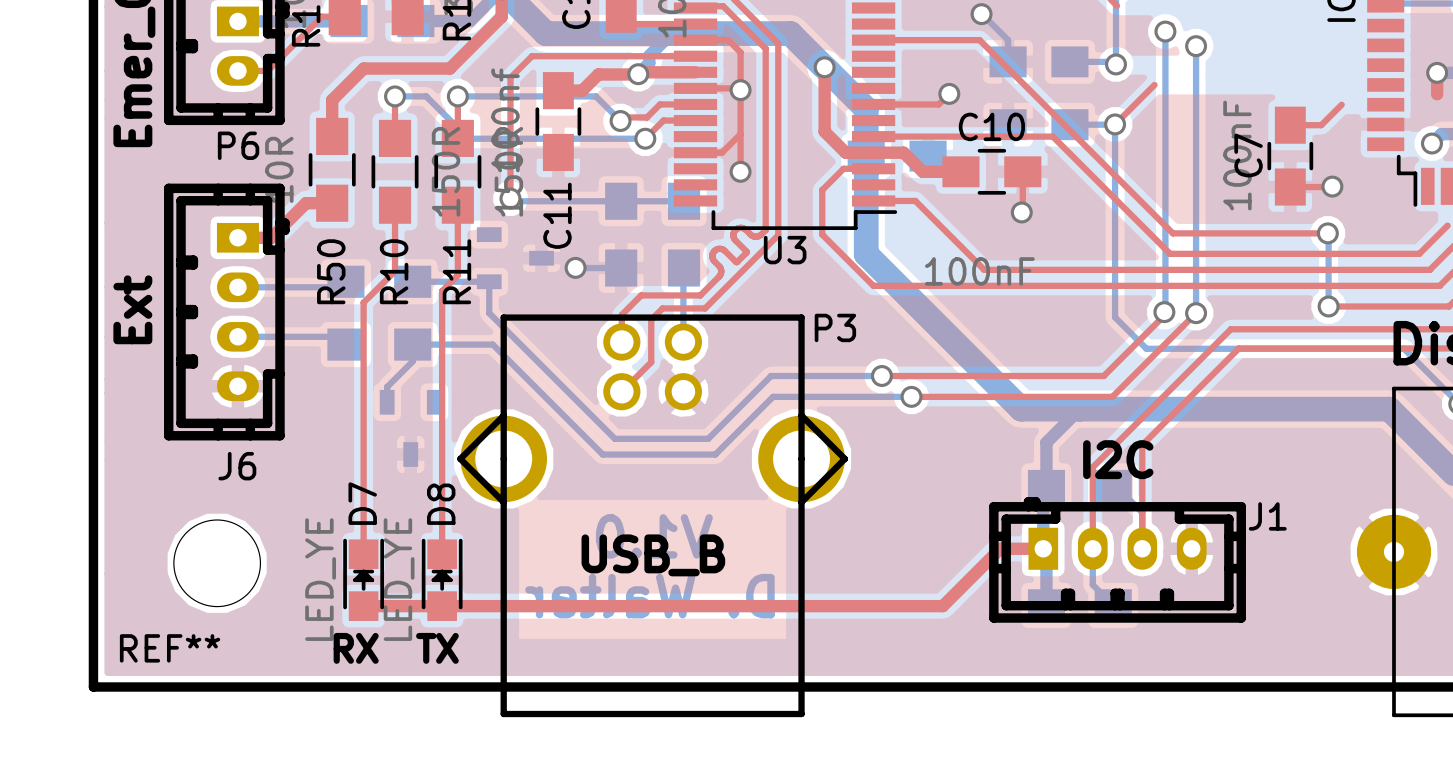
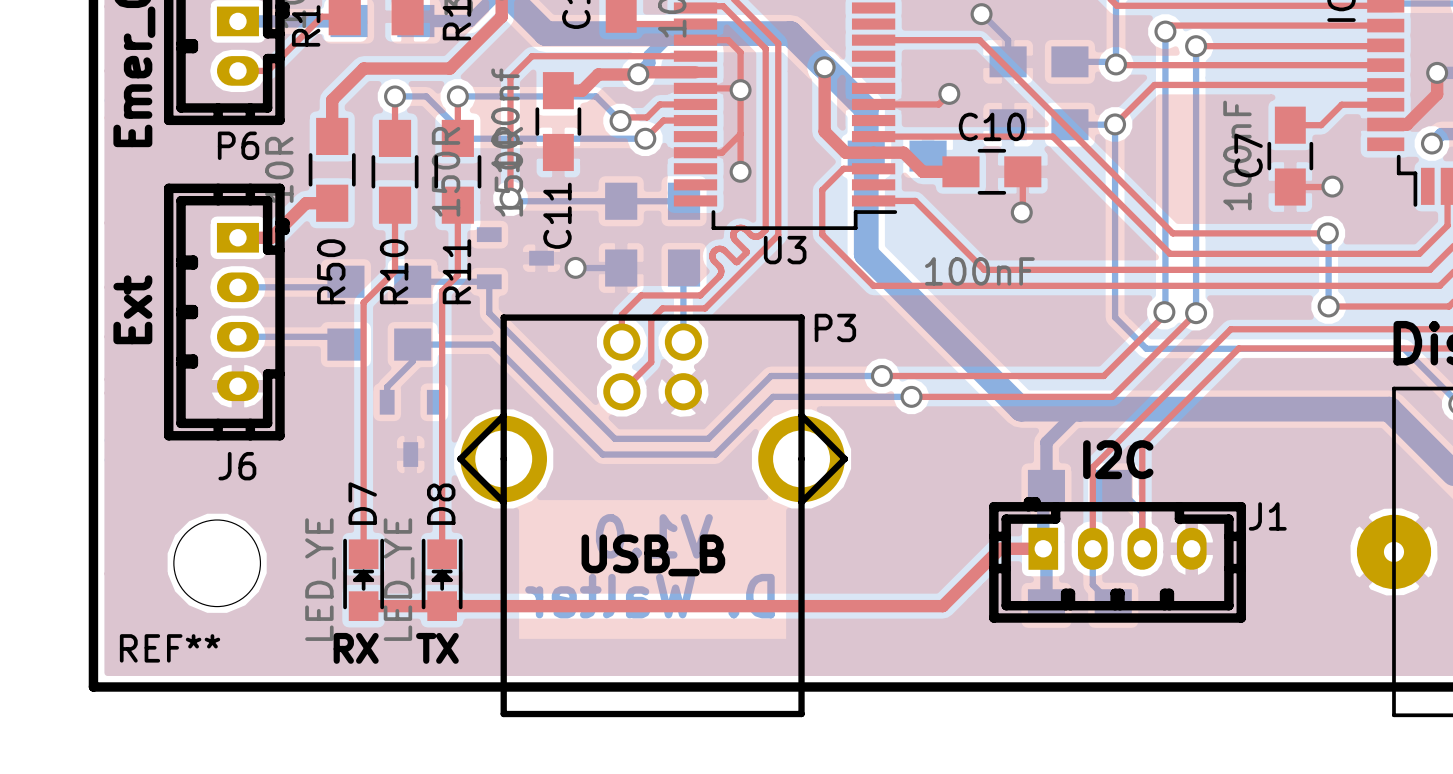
top track: none -> (1117, 5) (1385, 5)
top track: none -> (1171, 25) (1385, 25)
top track: none -> (1196, 46) (1384, 46)
top track: none -> (1116, 65) (1385, 65)
top track: none -> (1154, 84) (1385, 84)
top track: none -> (1437, 94) (1406, 124) (1385, 124)
top track: none -> (1341, 104) (1385, 104)
top track: none -> (1447, 186) (1447, 225)

